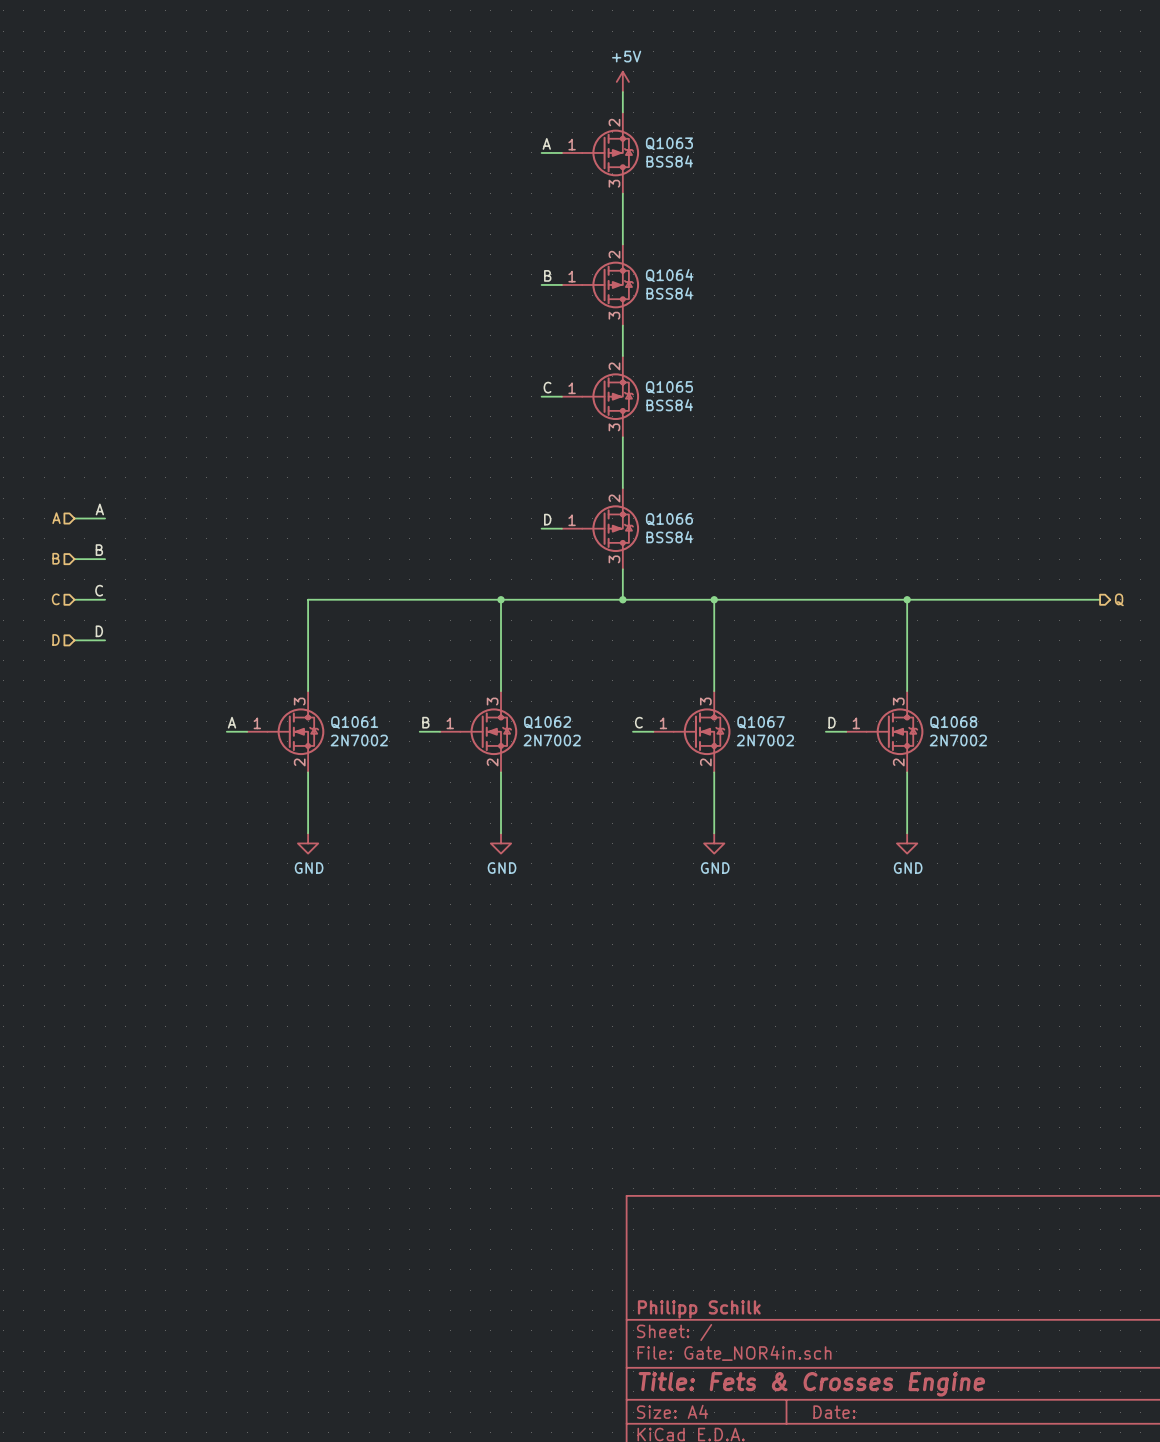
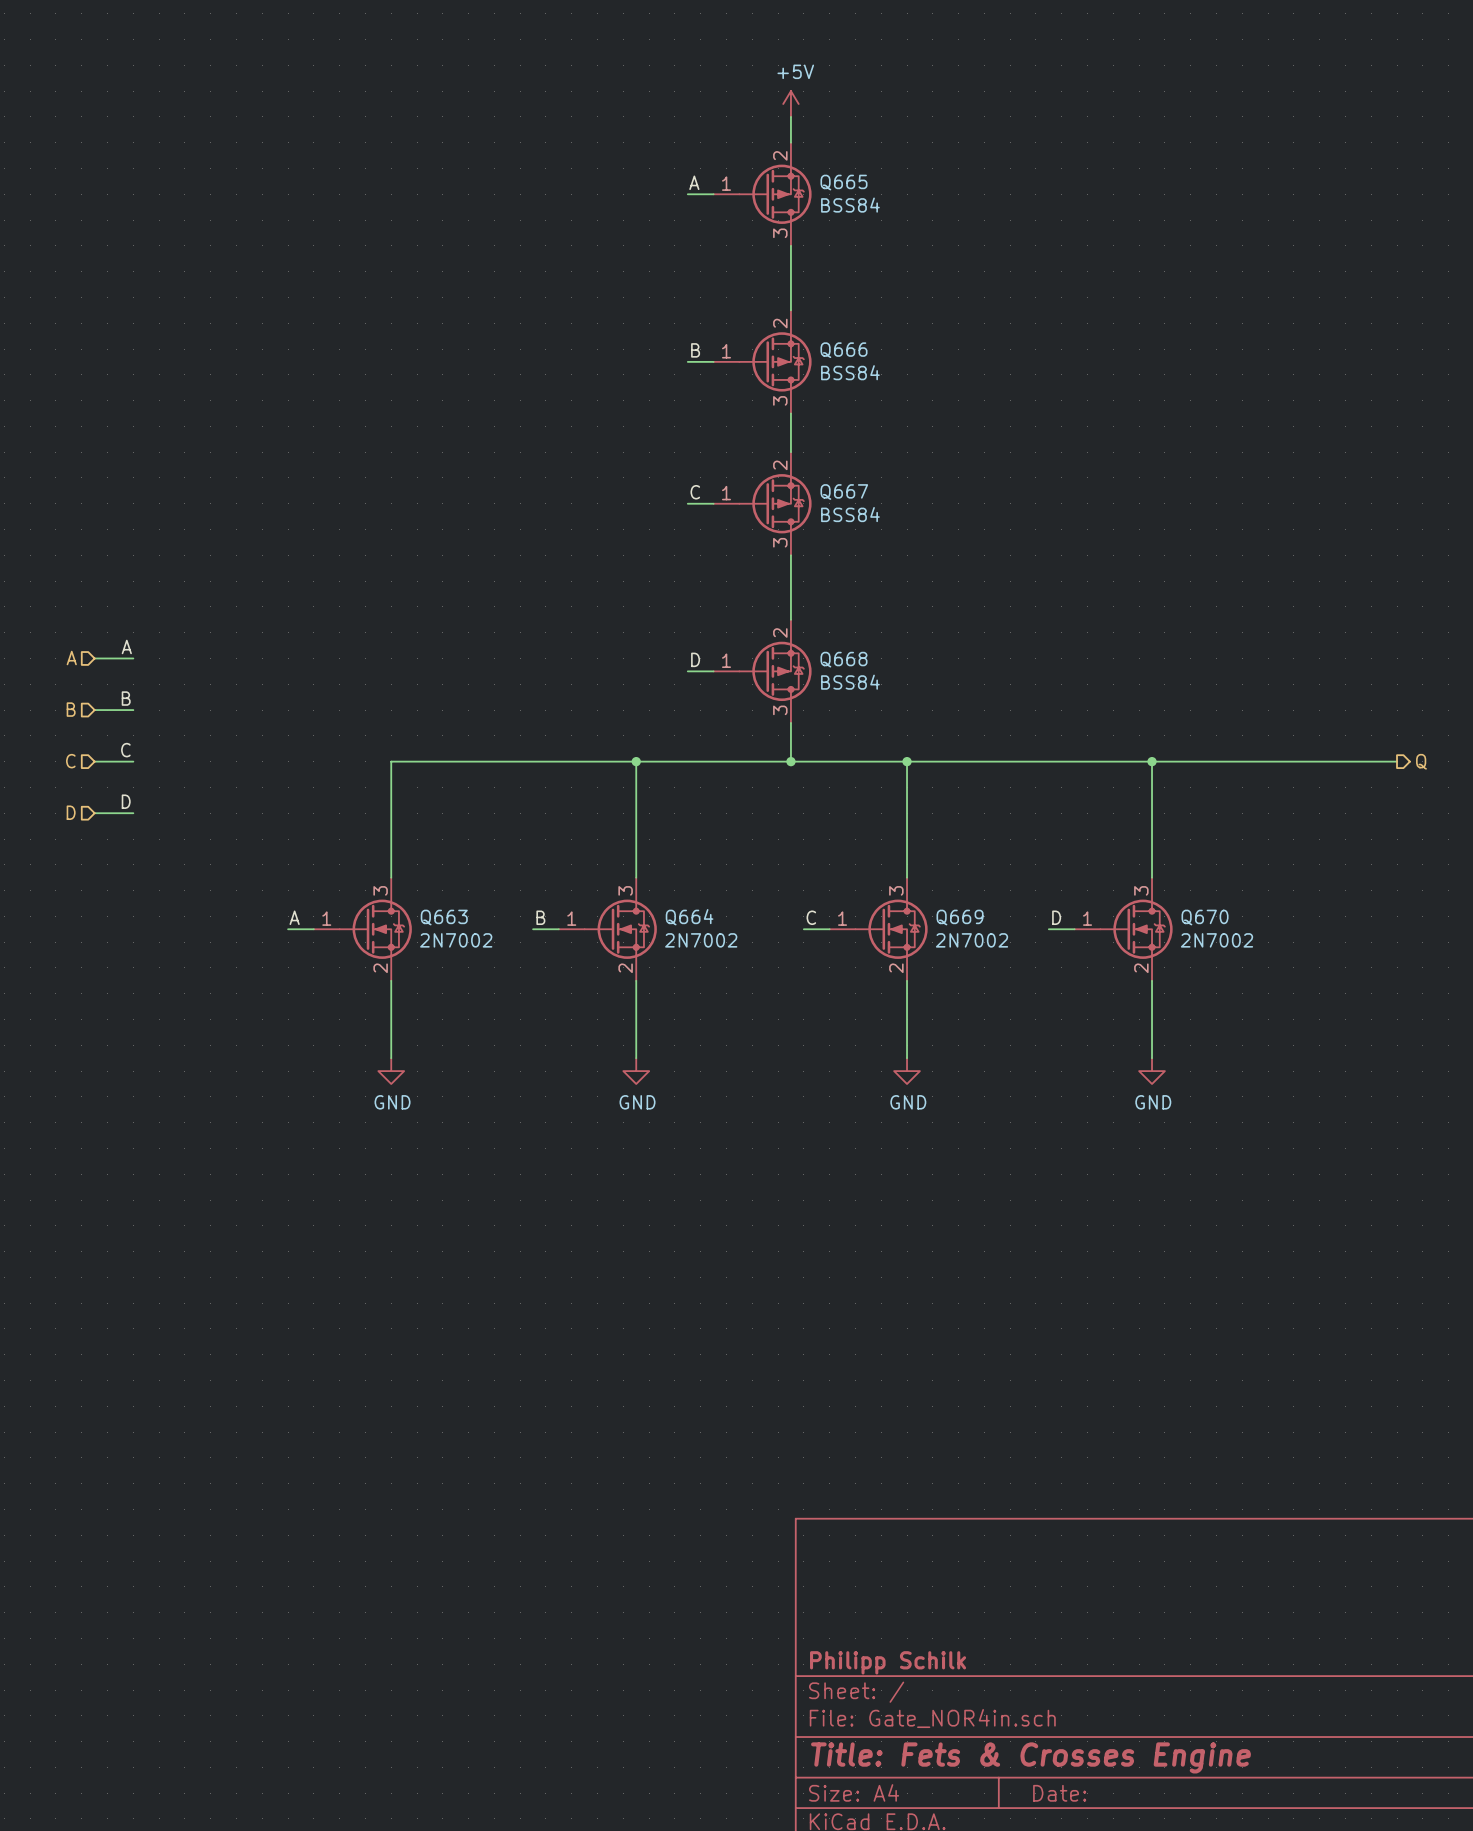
Q1063 name: Q1063 (669, 143) -> Q665 (843, 182)
Q1064 name: Q1064 (669, 275) -> Q666 (843, 350)
Q1065 name: Q1065 (669, 387) -> Q667 (844, 492)
Q1066 name: Q1066 (669, 519) -> Q668 (843, 659)
Q1061 name: Q1061 (354, 722) -> Q663 (444, 917)
Q1062 name: Q1062 (547, 722) -> Q664 (689, 917)
Q1067 name: Q1067 (761, 722) -> Q669 (960, 917)
Q1068 name: Q1068 (953, 722) -> Q670 (1205, 917)

